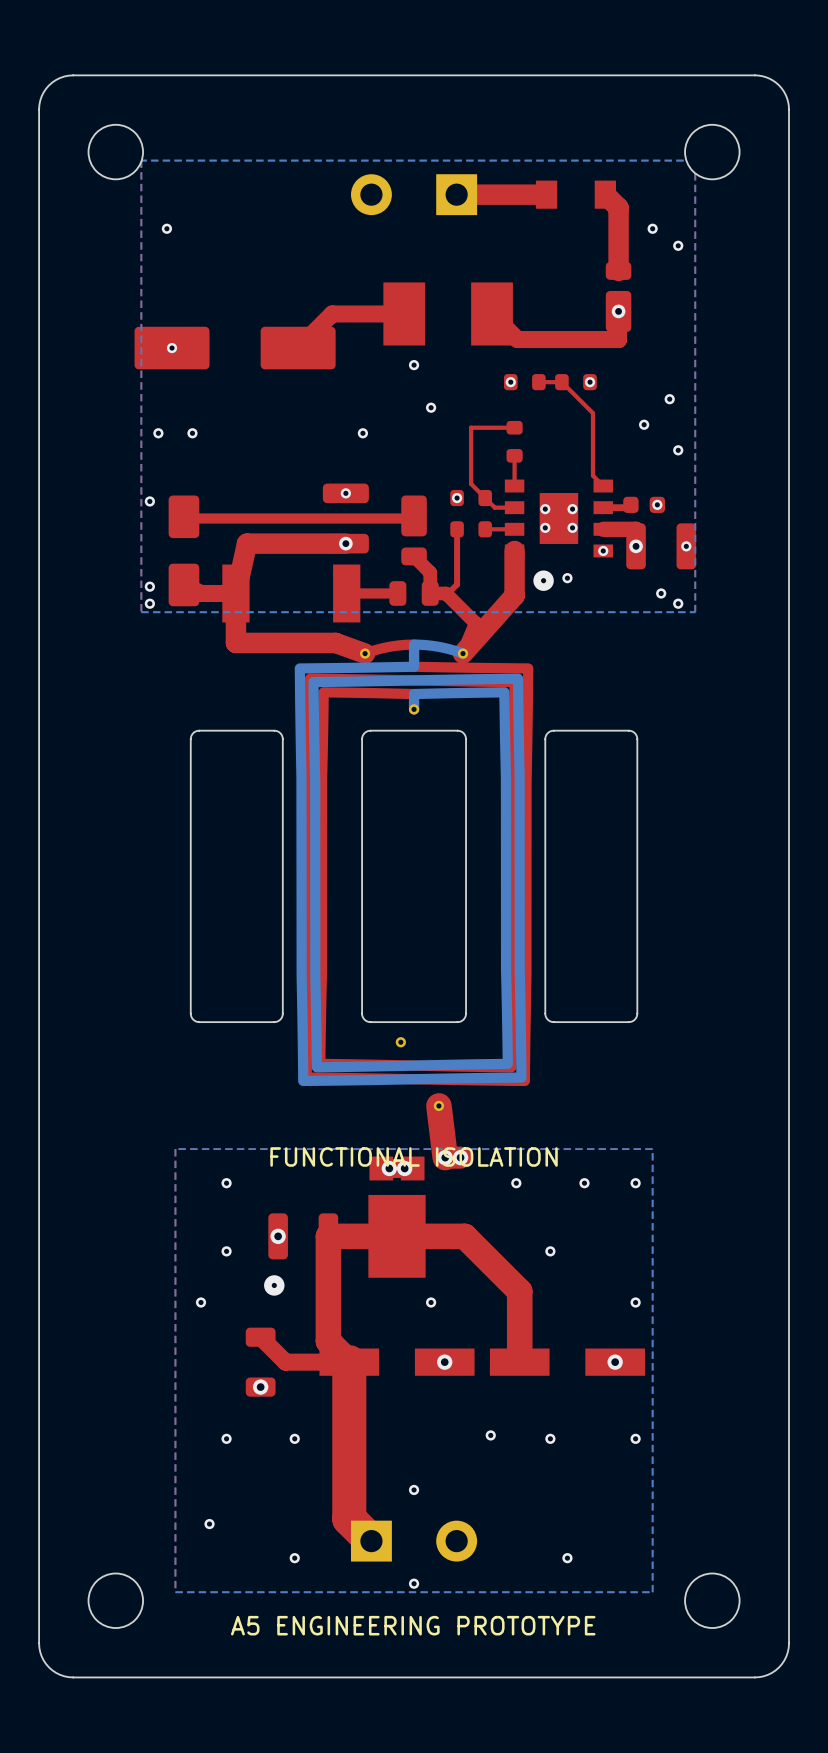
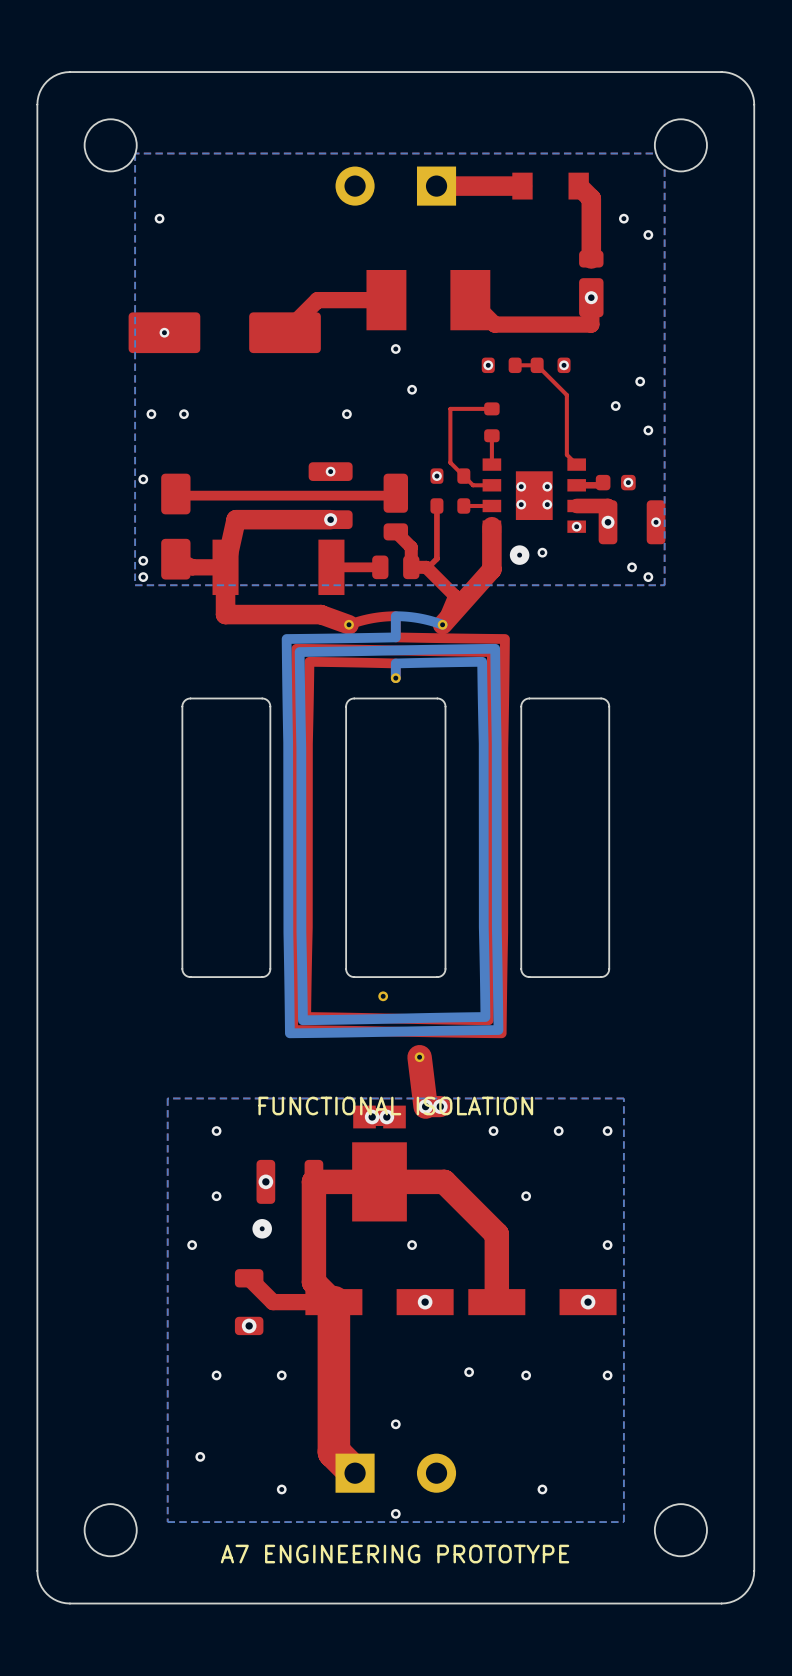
text: A5 ENGINEERING PROTOTYPE (413, 1625) -> A7 ENGINEERING PROTOTYPE (395, 1554)

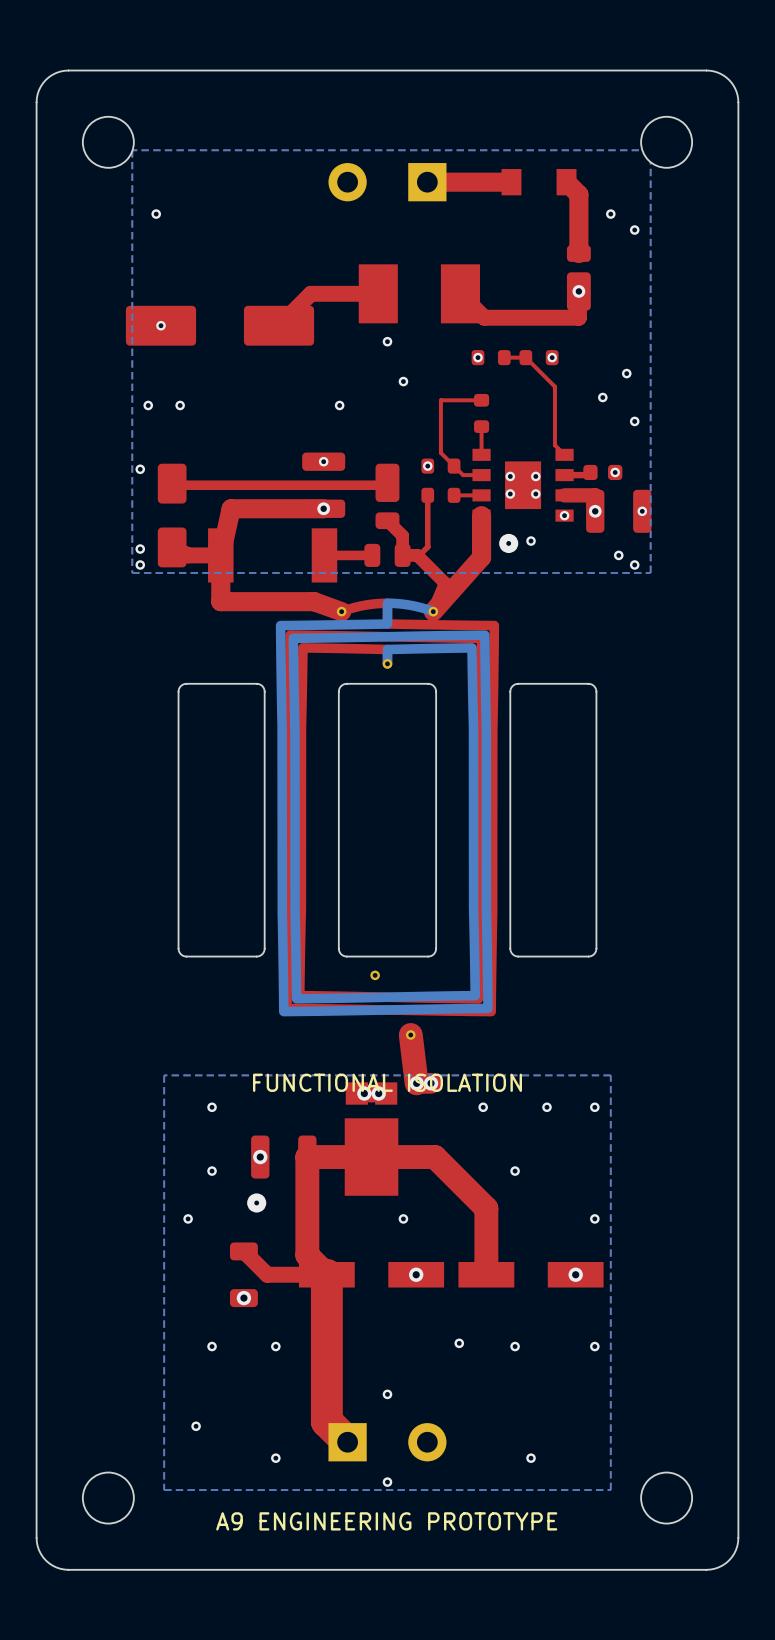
text: A7 ENGINEERING PROTOTYPE (395, 1554) -> A9 ENGINEERING PROTOTYPE (386, 1521)

